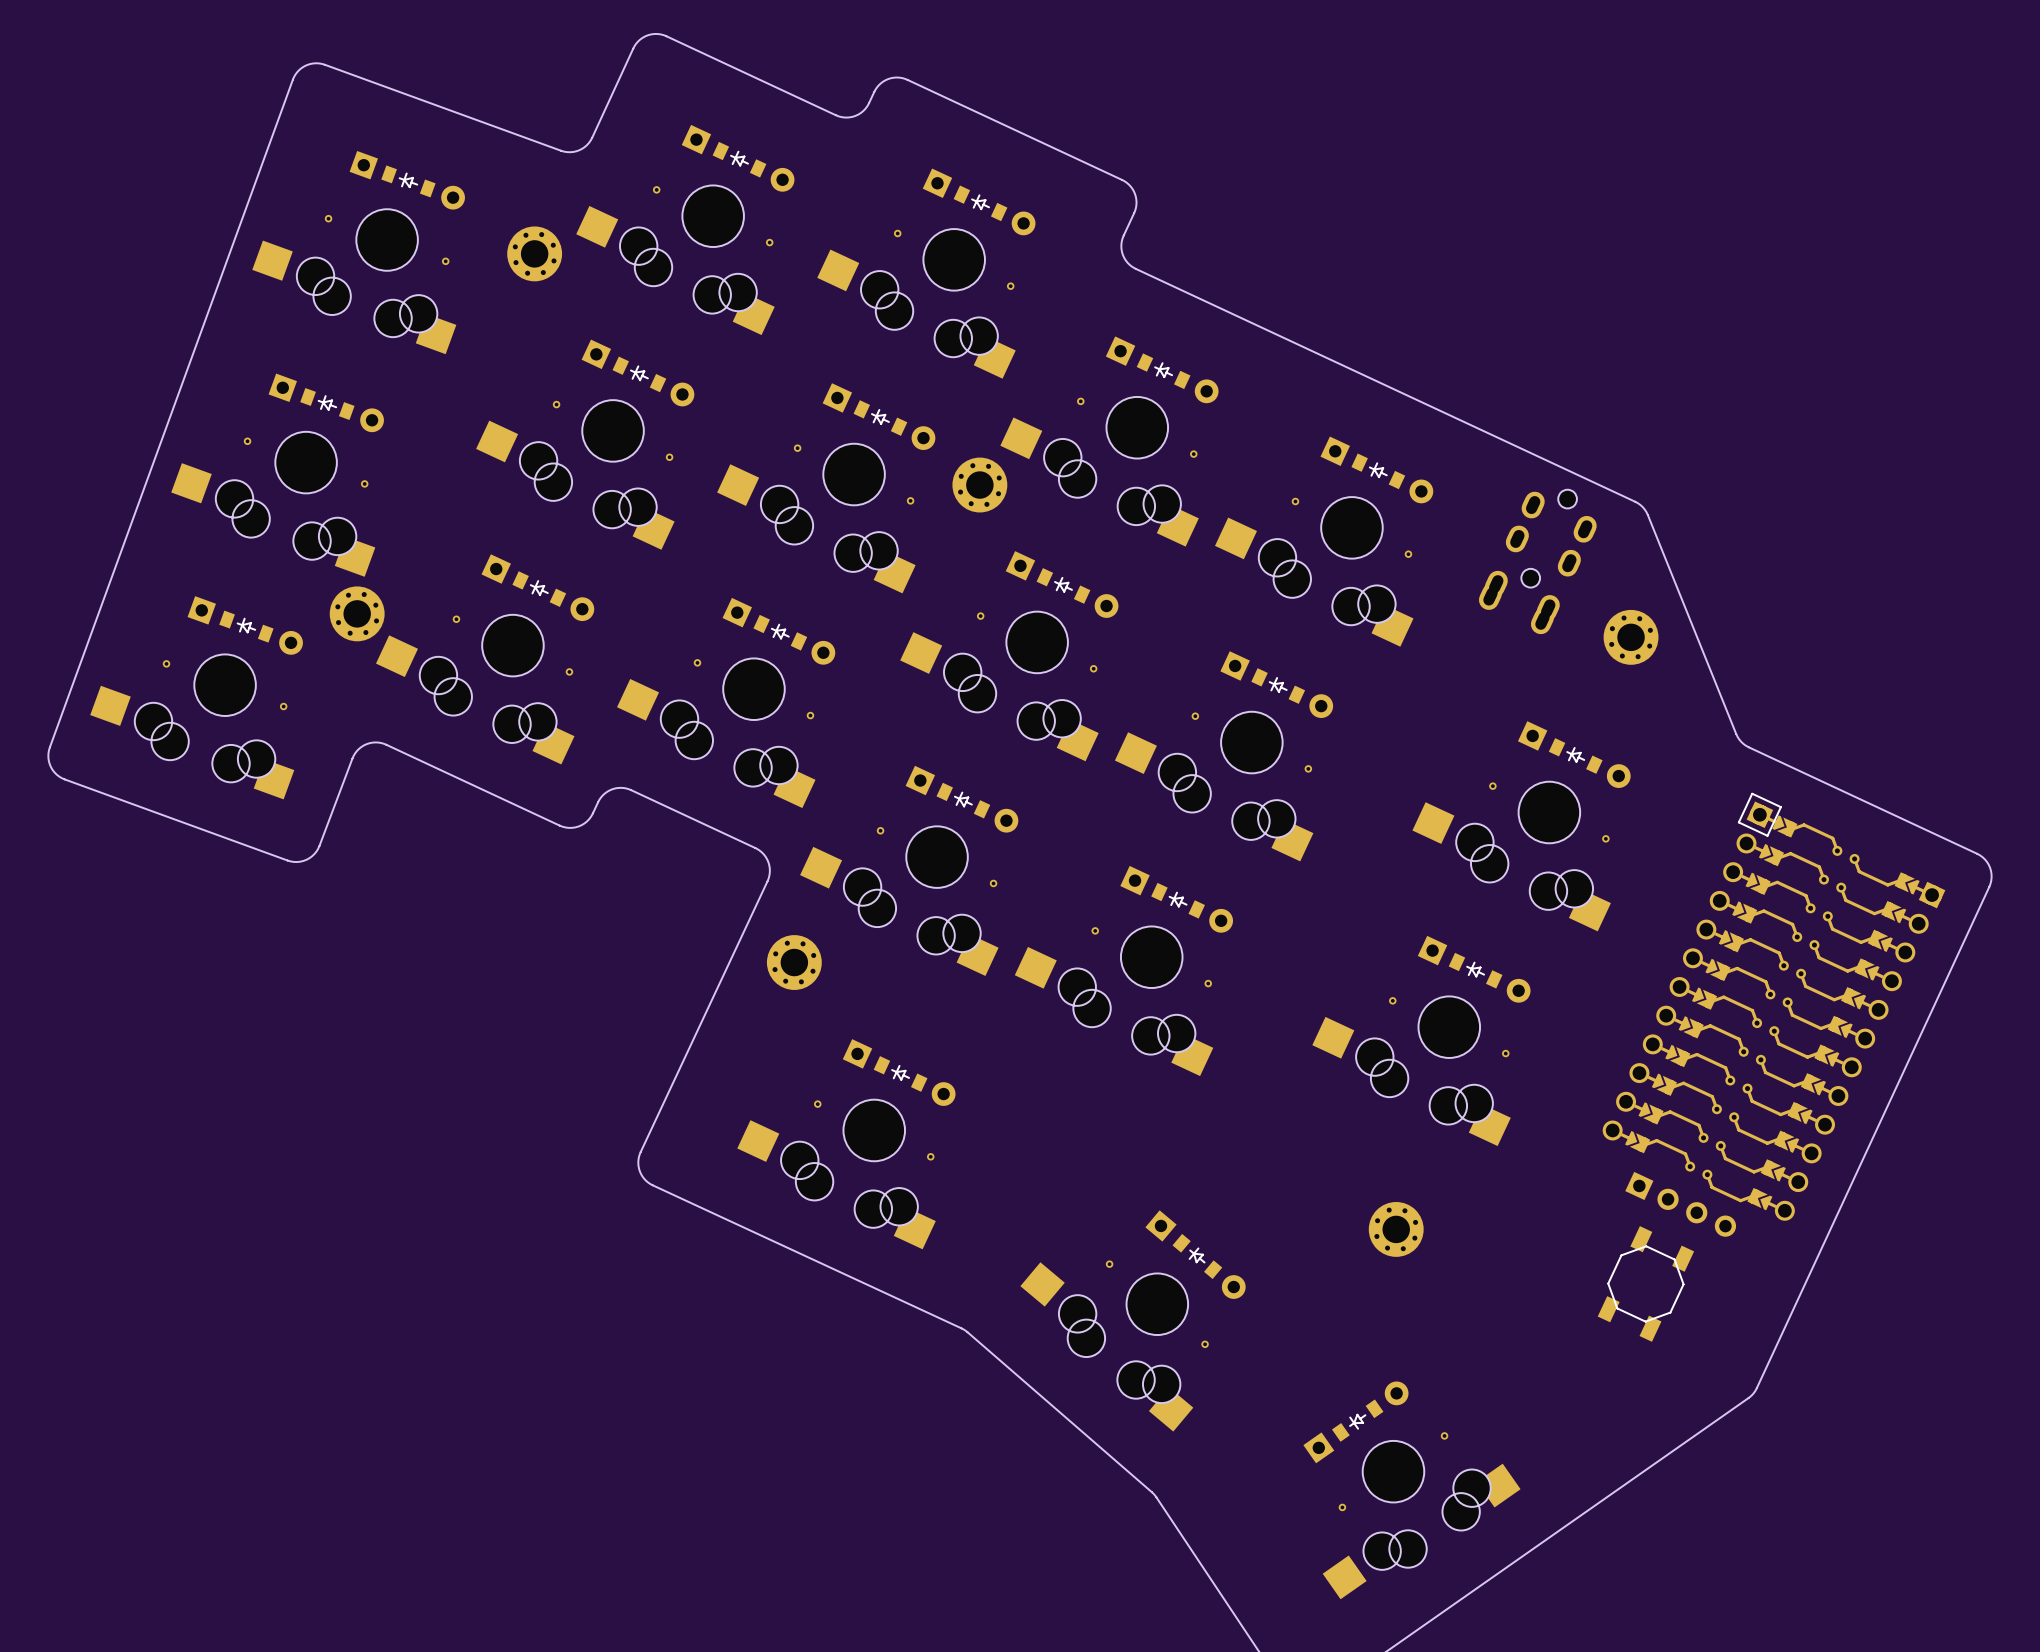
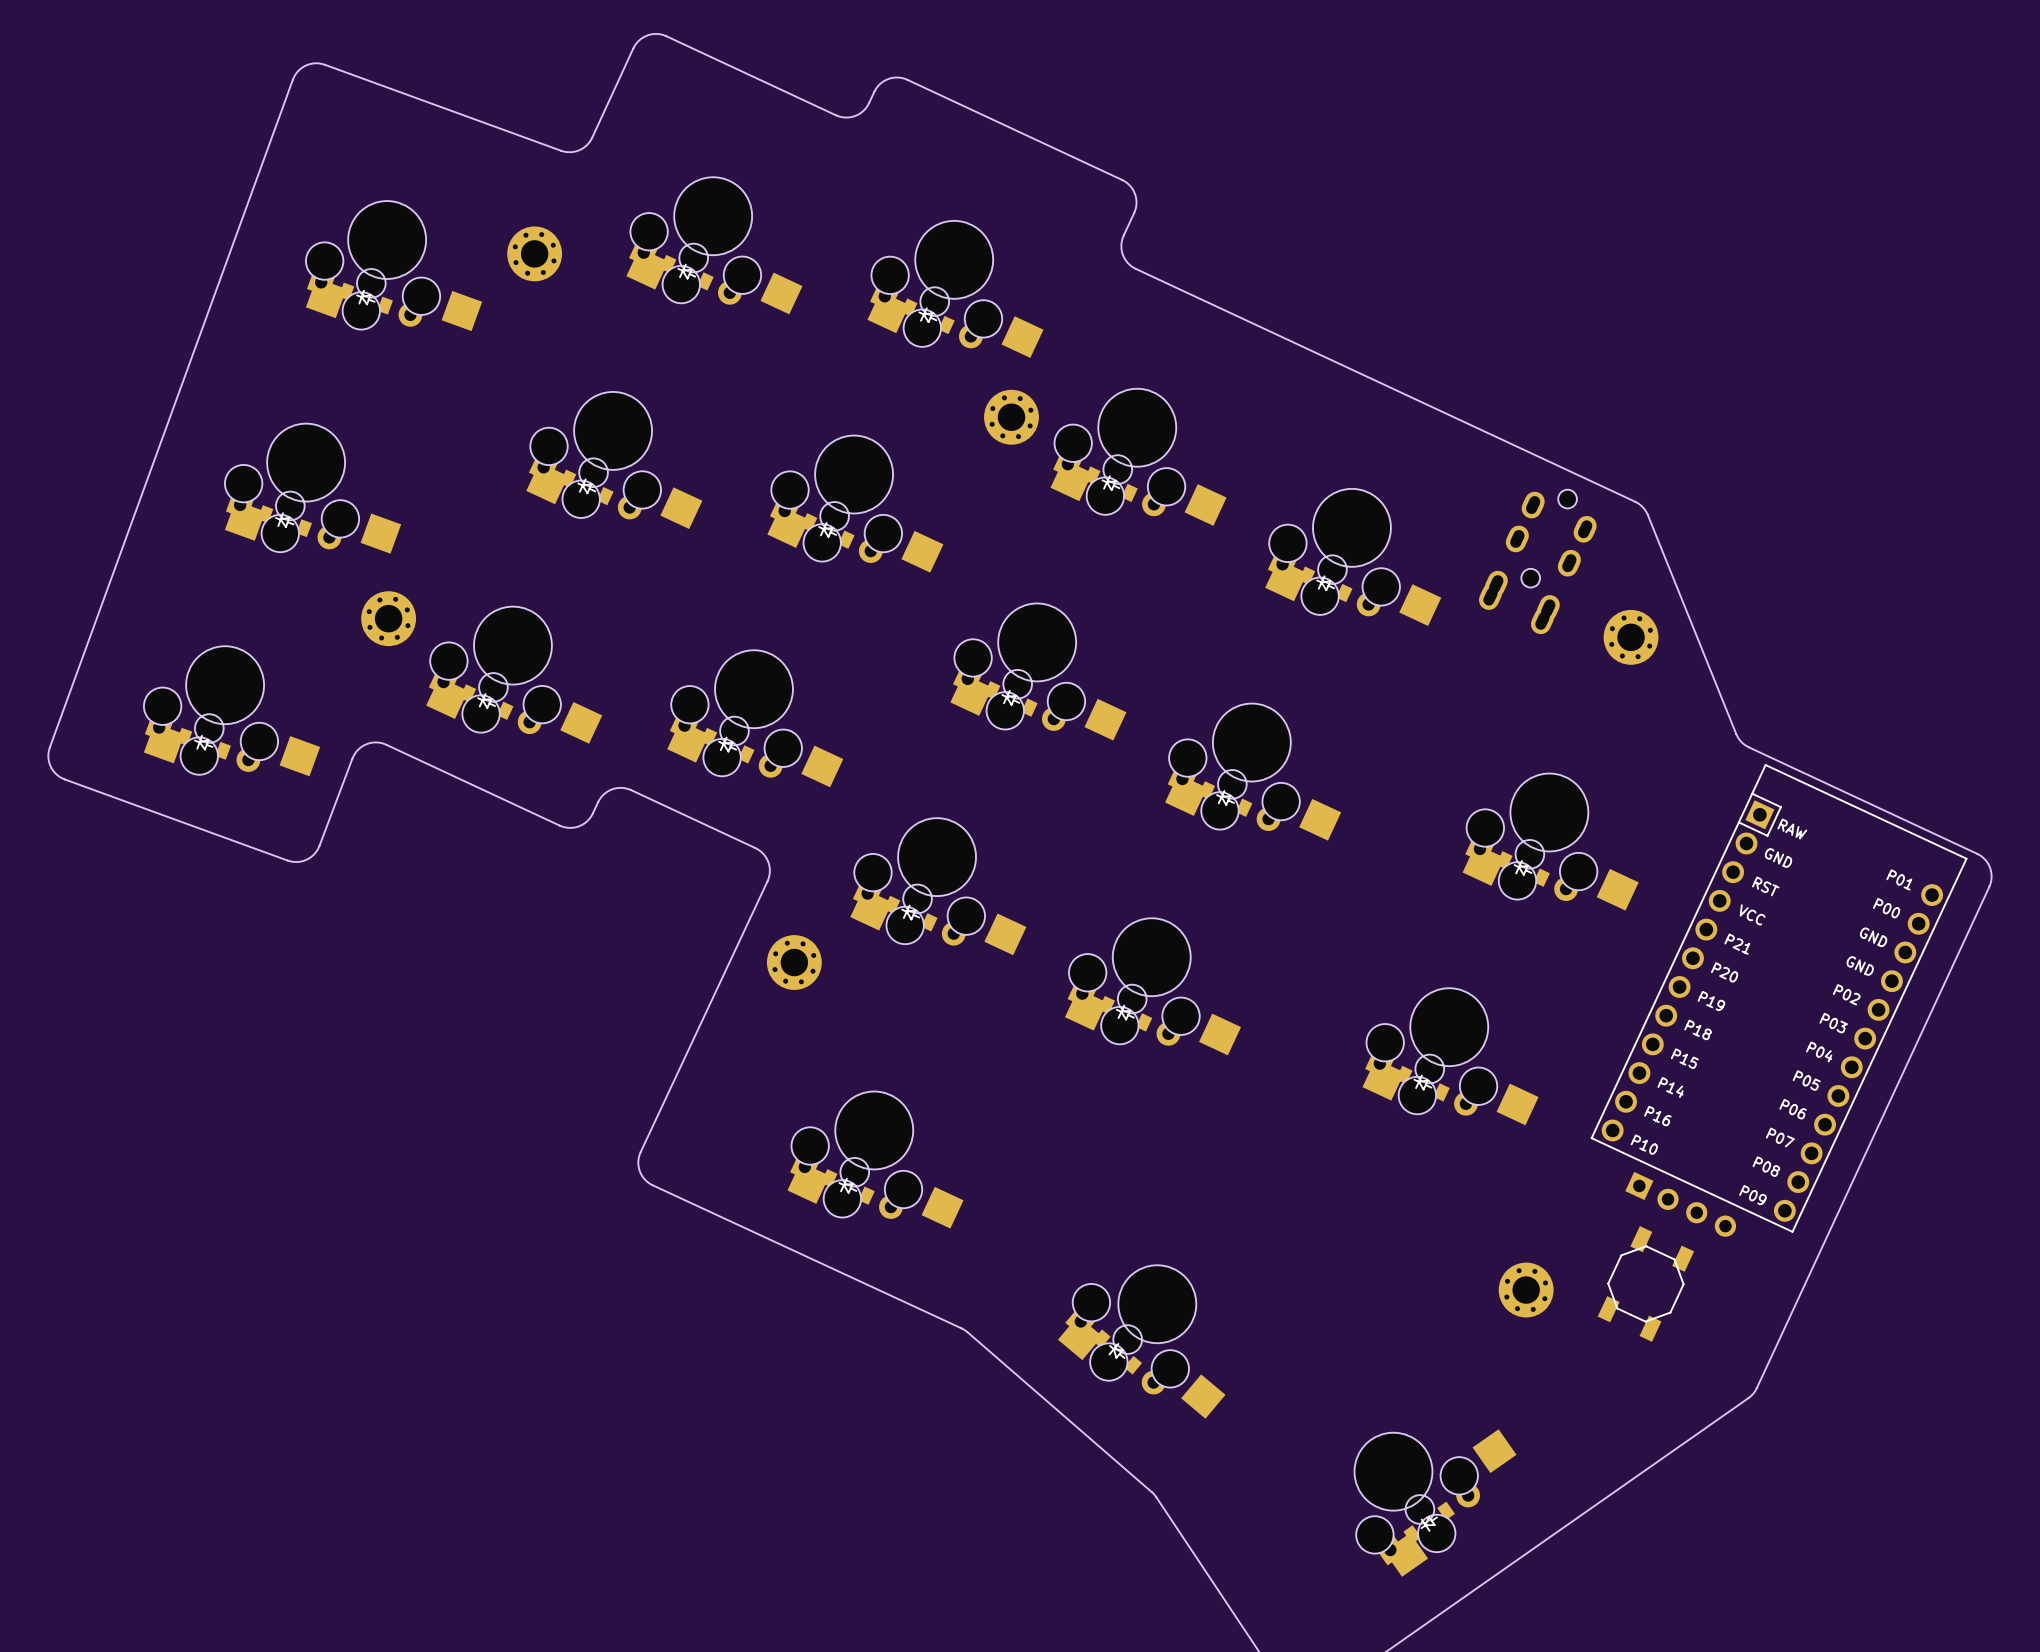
part: (738, 158) -> none
part: (407, 180) -> none
part: (656, 189) -> none
part: (979, 201) -> none
part: (328, 218) -> none
part: (897, 233) -> none
part: (769, 242) -> none
part: none -> (714, 245)
part: (675, 260) -> none
part: (445, 261) -> none
part: none -> (394, 266)
part: none -> (685, 271)
part: (354, 281) -> none
part: (1010, 286) -> none
part: none -> (955, 289)
part: none -> (364, 297)
part: (916, 303) -> none
part: none -> (926, 314)
part: (1162, 369) -> none
part: (637, 372) -> none
part: (1080, 401) -> none
part: (326, 402) -> none
part: (556, 404) -> none
part: (879, 416) -> none
part: (247, 441) -> none
part: (797, 448) -> none
part: (1193, 454) -> none
part: (669, 457) -> none
part: none -> (1138, 457)
part: none -> (614, 460)
part: (1376, 469) -> none
part: (1099, 471) -> none
part: (575, 474) -> none
part: none -> (1109, 482)
part: (364, 483) -> none
part: none -> (585, 485)
part position: (979, 485) -> (1011, 417)
part: none -> (313, 488)
part: (910, 500) -> none
part: (1295, 501) -> none
part: (273, 504) -> none
part: none -> (855, 504)
part: (816, 518) -> none
part: none -> (283, 520)
part: none -> (826, 529)
part: (1408, 554) -> none
part: none -> (1353, 557)
part: (1314, 571) -> none
part: none -> (1324, 582)
part: (1062, 584) -> none
part: (537, 587) -> none
part position: (357, 613) -> (388, 618)
part: (980, 616) -> none
part: (456, 619) -> none
part: (245, 625) -> none
part: (778, 631) -> none
part: (697, 662) -> none
part: (166, 663) -> none
part: (1093, 668) -> none
part: (569, 671) -> none
part: none -> (1038, 672)
part: none -> (514, 675)
part: (1276, 684) -> none
part: (999, 686) -> none
part: (475, 689) -> none
part: none -> (1009, 697)
part: none -> (485, 700)
part: (283, 706) -> none
part: none -> (232, 711)
part: (810, 715) -> none
part: (1195, 716) -> none
part: none -> (755, 718)
part: (192, 726) -> none
part: (716, 733) -> none
part: none -> (202, 742)
part: none -> (726, 744)
part position: (1574, 754) -> (1521, 867)
part: (1308, 768) -> none
part: none -> (1253, 772)
part: (1214, 786) -> none
part: (1492, 786) -> none
part footprint: [1602, 792, 1946, 1221] -> [1590, 764, 1968, 1233]
part: none -> (1224, 797)
part: (961, 799) -> none
part: (880, 830) -> none
part: (1605, 838) -> none
part: none -> (1550, 842)
part: (1511, 856) -> none
part: (993, 883) -> none
part: none -> (938, 886)
part: (1176, 899) -> none
part: (899, 901) -> none
part: none -> (909, 912)
part: (1095, 930) -> none
part: (1474, 969) -> none
part: (1208, 983) -> none
part: none -> (1153, 986)
part: (1392, 1000) -> none
part: (1114, 1001) -> none
part: none -> (1123, 1012)
part: (1505, 1053) -> none
part: none -> (1450, 1056)
part: (1411, 1071) -> none
part: (899, 1072) -> none
part: none -> (1421, 1082)
part: (817, 1104) -> none
part: (930, 1156) -> none
part: none -> (875, 1160)
part: (836, 1174) -> none
part: none -> (846, 1185)
part position: (1396, 1229) -> (1526, 1290)
part: (1195, 1254) -> none
part footprint: [1020, 1262, 1194, 1432] -> [1065, 1305, 1166, 1395]
part: (1109, 1264) -> none
part: none -> (1141, 1341)
part: (1205, 1344) -> none
part: (1355, 1422) -> none
part: (1444, 1435) -> none
part footprint: [1322, 1440, 1521, 1600] -> [1374, 1483, 1481, 1566]
part: none -> (1435, 1503)
part: (1342, 1507) -> none

